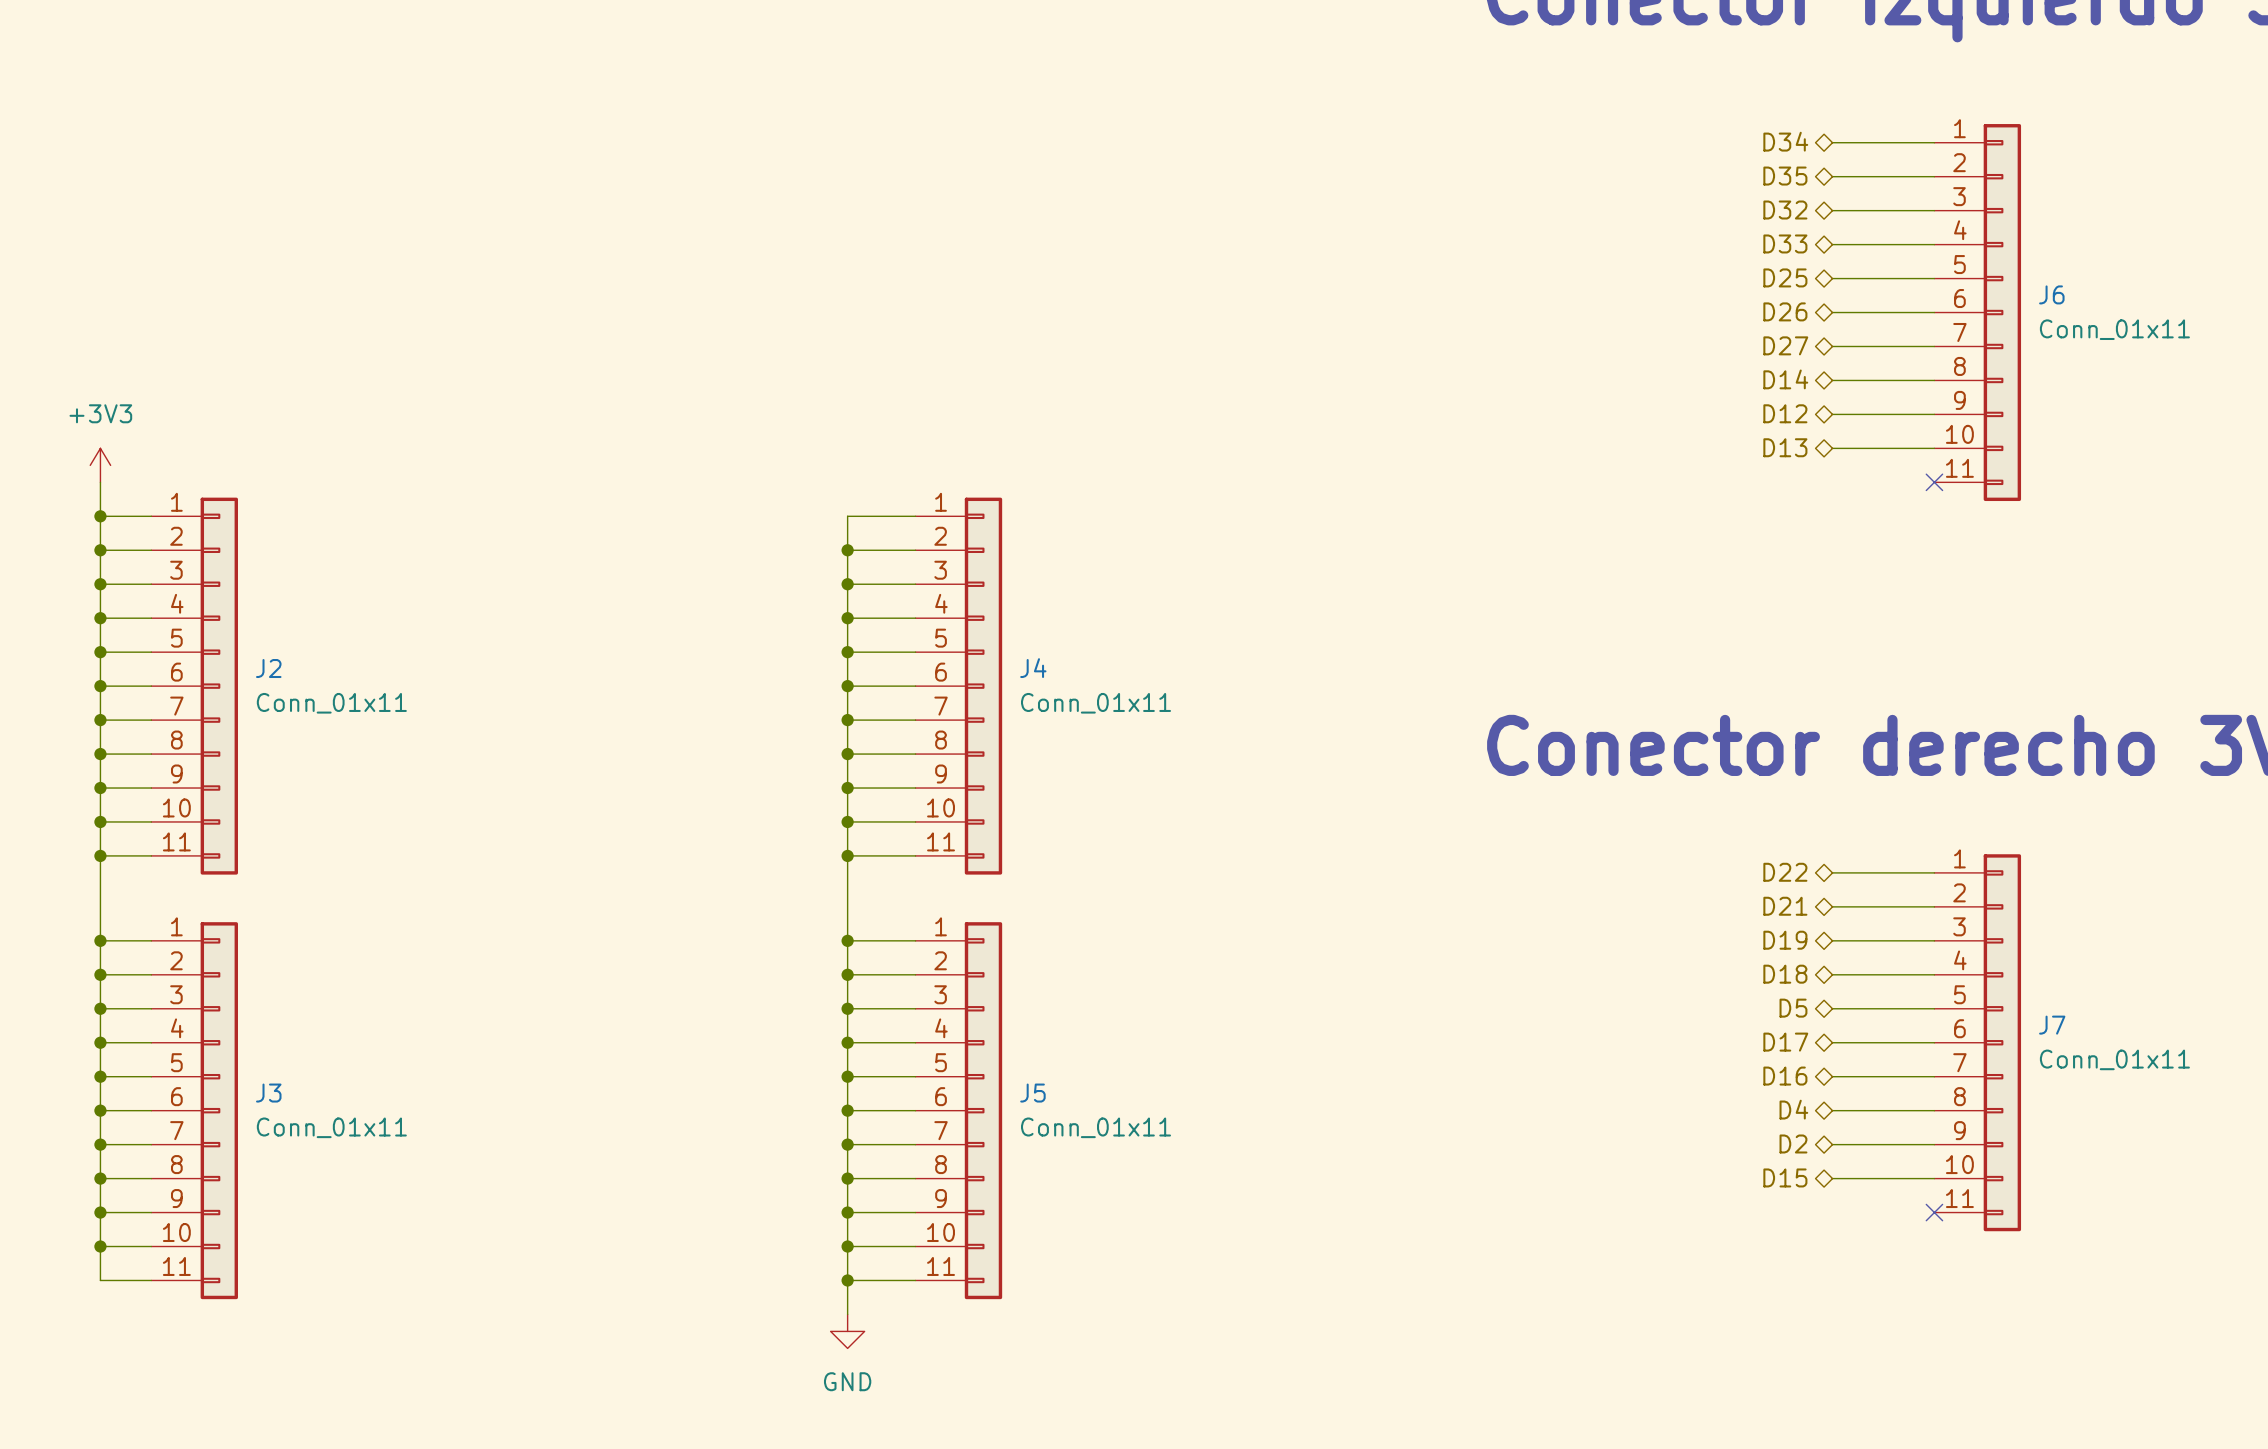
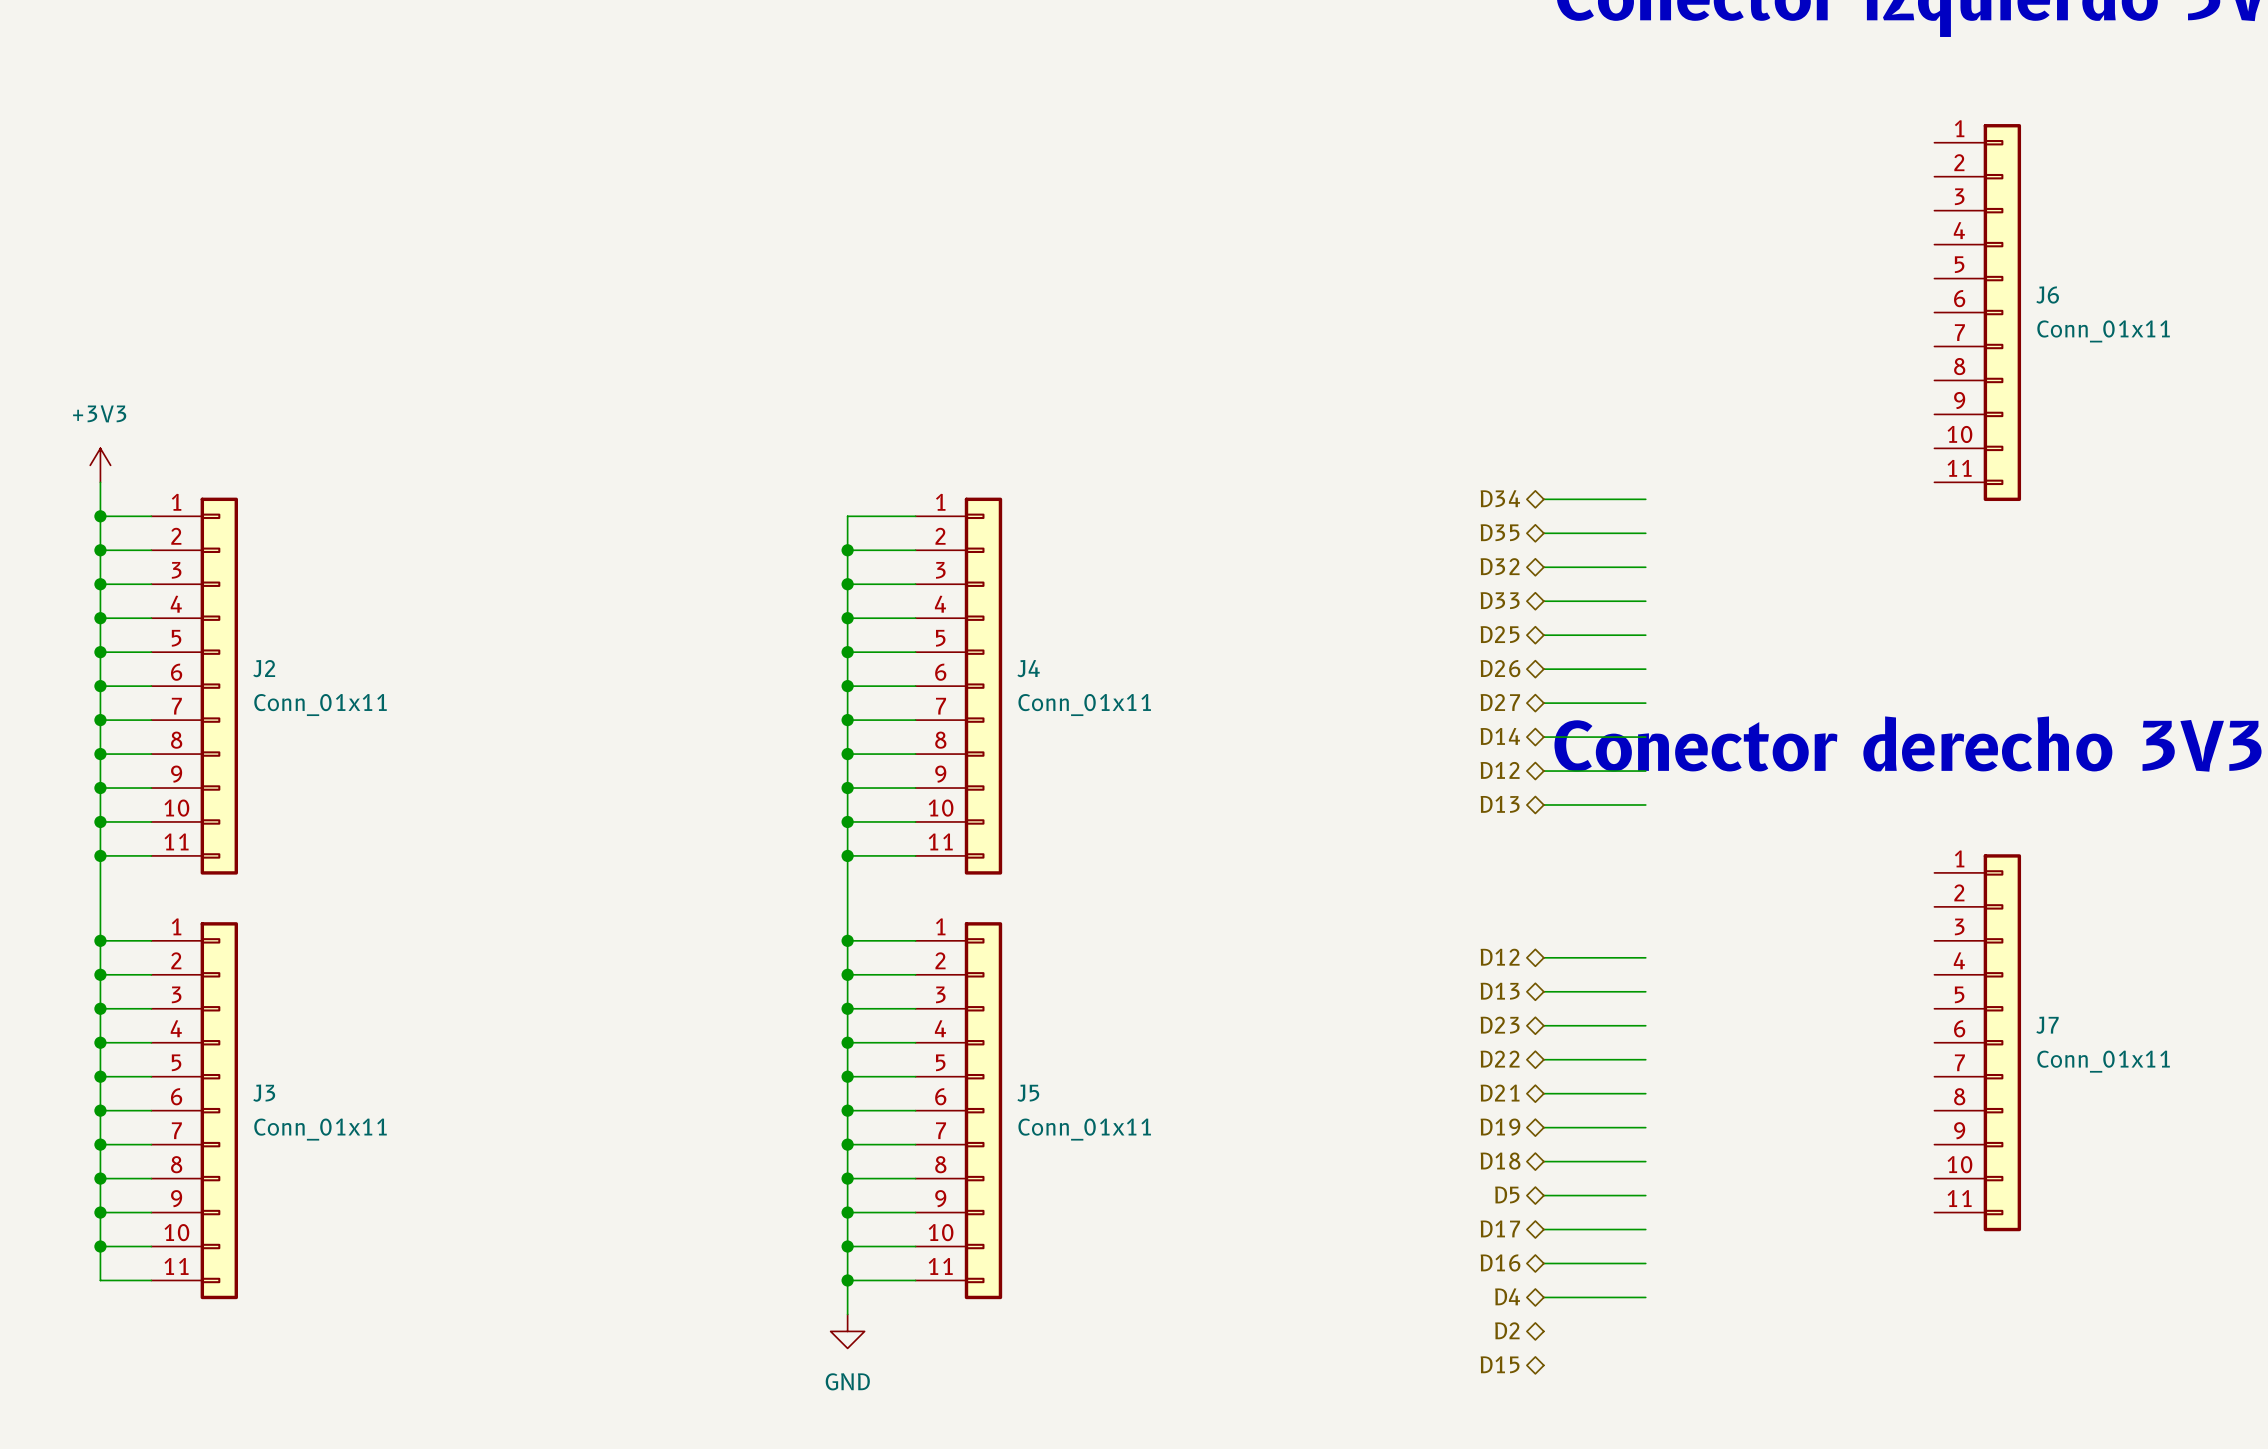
hierarchical label: D34 (1785, 141) -> none
wire: (1832, 142) (1934, 142) -> none
hierarchical label: D35 (1785, 176) -> none
wire: (1832, 176) (1934, 176) -> none
hierarchical label: D32 (1785, 210) -> none
wire: (1832, 210) (1934, 210) -> none
hierarchical label: D33 (1785, 243) -> none
wire: (1832, 244) (1934, 244) -> none
hierarchical label: D25 (1785, 277) -> none
wire: (1832, 278) (1934, 278) -> none
hierarchical label: D26 (1785, 311) -> none
wire: (1832, 312) (1934, 312) -> none
hierarchical label: D27 (1785, 345) -> none
wire: (1832, 346) (1934, 346) -> none
hierarchical label: D14 (1785, 379) -> none
wire: (1832, 380) (1934, 380) -> (1543, 499) (1645, 499)
hierarchical label: D12 (1785, 413) -> none
wire: (1832, 414) (1934, 414) -> (1543, 533) (1645, 533)
hierarchical label: D13 (1785, 447) -> none
wire: (1832, 448) (1934, 448) -> (1543, 567) (1645, 567)
no-connect mark: (1934, 482) -> none
hierarchical label: none -> D34 (1500, 498)
hierarchical label: none -> D35 (1500, 532)
hierarchical label: none -> D32 (1500, 566)
hierarchical label: none -> D33 (1500, 600)
wire: none -> (1543, 601) (1645, 601)
hierarchical label: none -> D25 (1500, 634)
wire: none -> (1543, 635) (1645, 635)
hierarchical label: none -> D26 (1500, 668)
wire: none -> (1543, 669) (1645, 669)
hierarchical label: none -> D27 (1500, 702)
wire: none -> (1543, 703) (1645, 703)
hierarchical label: none -> D14 (1500, 736)
wire: none -> (1543, 737) (1645, 737)
hierarchical label: none -> D12 (1500, 770)
wire: none -> (1543, 771) (1645, 771)
hierarchical label: none -> D13 (1500, 804)
wire: none -> (1543, 804) (1645, 804)
hierarchical label: D22 (1785, 872) -> none
wire: (1832, 872) (1934, 872) -> (1543, 991) (1645, 991)
hierarchical label: D21 (1785, 906) -> none
wire: (1832, 906) (1934, 906) -> (1543, 1025) (1645, 1025)
hierarchical label: D19 (1785, 940) -> none
wire: (1832, 940) (1934, 940) -> (1543, 1059) (1645, 1059)
hierarchical label: none -> D12 (1500, 957)
wire: none -> (1543, 957) (1645, 957)
hierarchical label: D18 (1785, 974) -> none
wire: (1832, 974) (1934, 974) -> (1543, 1093) (1645, 1093)
hierarchical label: none -> D13 (1500, 991)
hierarchical label: D5 (1793, 1008) -> none
wire: (1832, 1008) (1934, 1008) -> (1543, 1127) (1645, 1127)
hierarchical label: none -> D23 (1500, 1025)
hierarchical label: D17 (1785, 1042) -> none
wire: (1832, 1042) (1934, 1042) -> (1543, 1161) (1645, 1161)
hierarchical label: none -> D22 (1500, 1059)
hierarchical label: D16 (1785, 1076) -> none
wire: (1832, 1076) (1934, 1076) -> (1543, 1195) (1645, 1195)
hierarchical label: none -> D21 (1500, 1093)
hierarchical label: D4 (1793, 1109) -> none
wire: (1832, 1110) (1934, 1110) -> (1543, 1229) (1645, 1229)
hierarchical label: none -> D19 (1500, 1127)
hierarchical label: D2 (1793, 1143) -> none
wire: (1832, 1144) (1934, 1144) -> (1543, 1263) (1645, 1263)
hierarchical label: none -> D18 (1500, 1161)
hierarchical label: D15 (1785, 1177) -> none
wire: (1832, 1178) (1934, 1178) -> (1543, 1297) (1645, 1297)
hierarchical label: none -> D5 (1507, 1194)
no-connect mark: (1934, 1212) -> none
hierarchical label: none -> D17 (1500, 1228)
hierarchical label: none -> D16 (1500, 1262)
hierarchical label: none -> D4 (1507, 1296)
hierarchical label: none -> D2 (1507, 1330)
hierarchical label: none -> D15 (1500, 1364)

